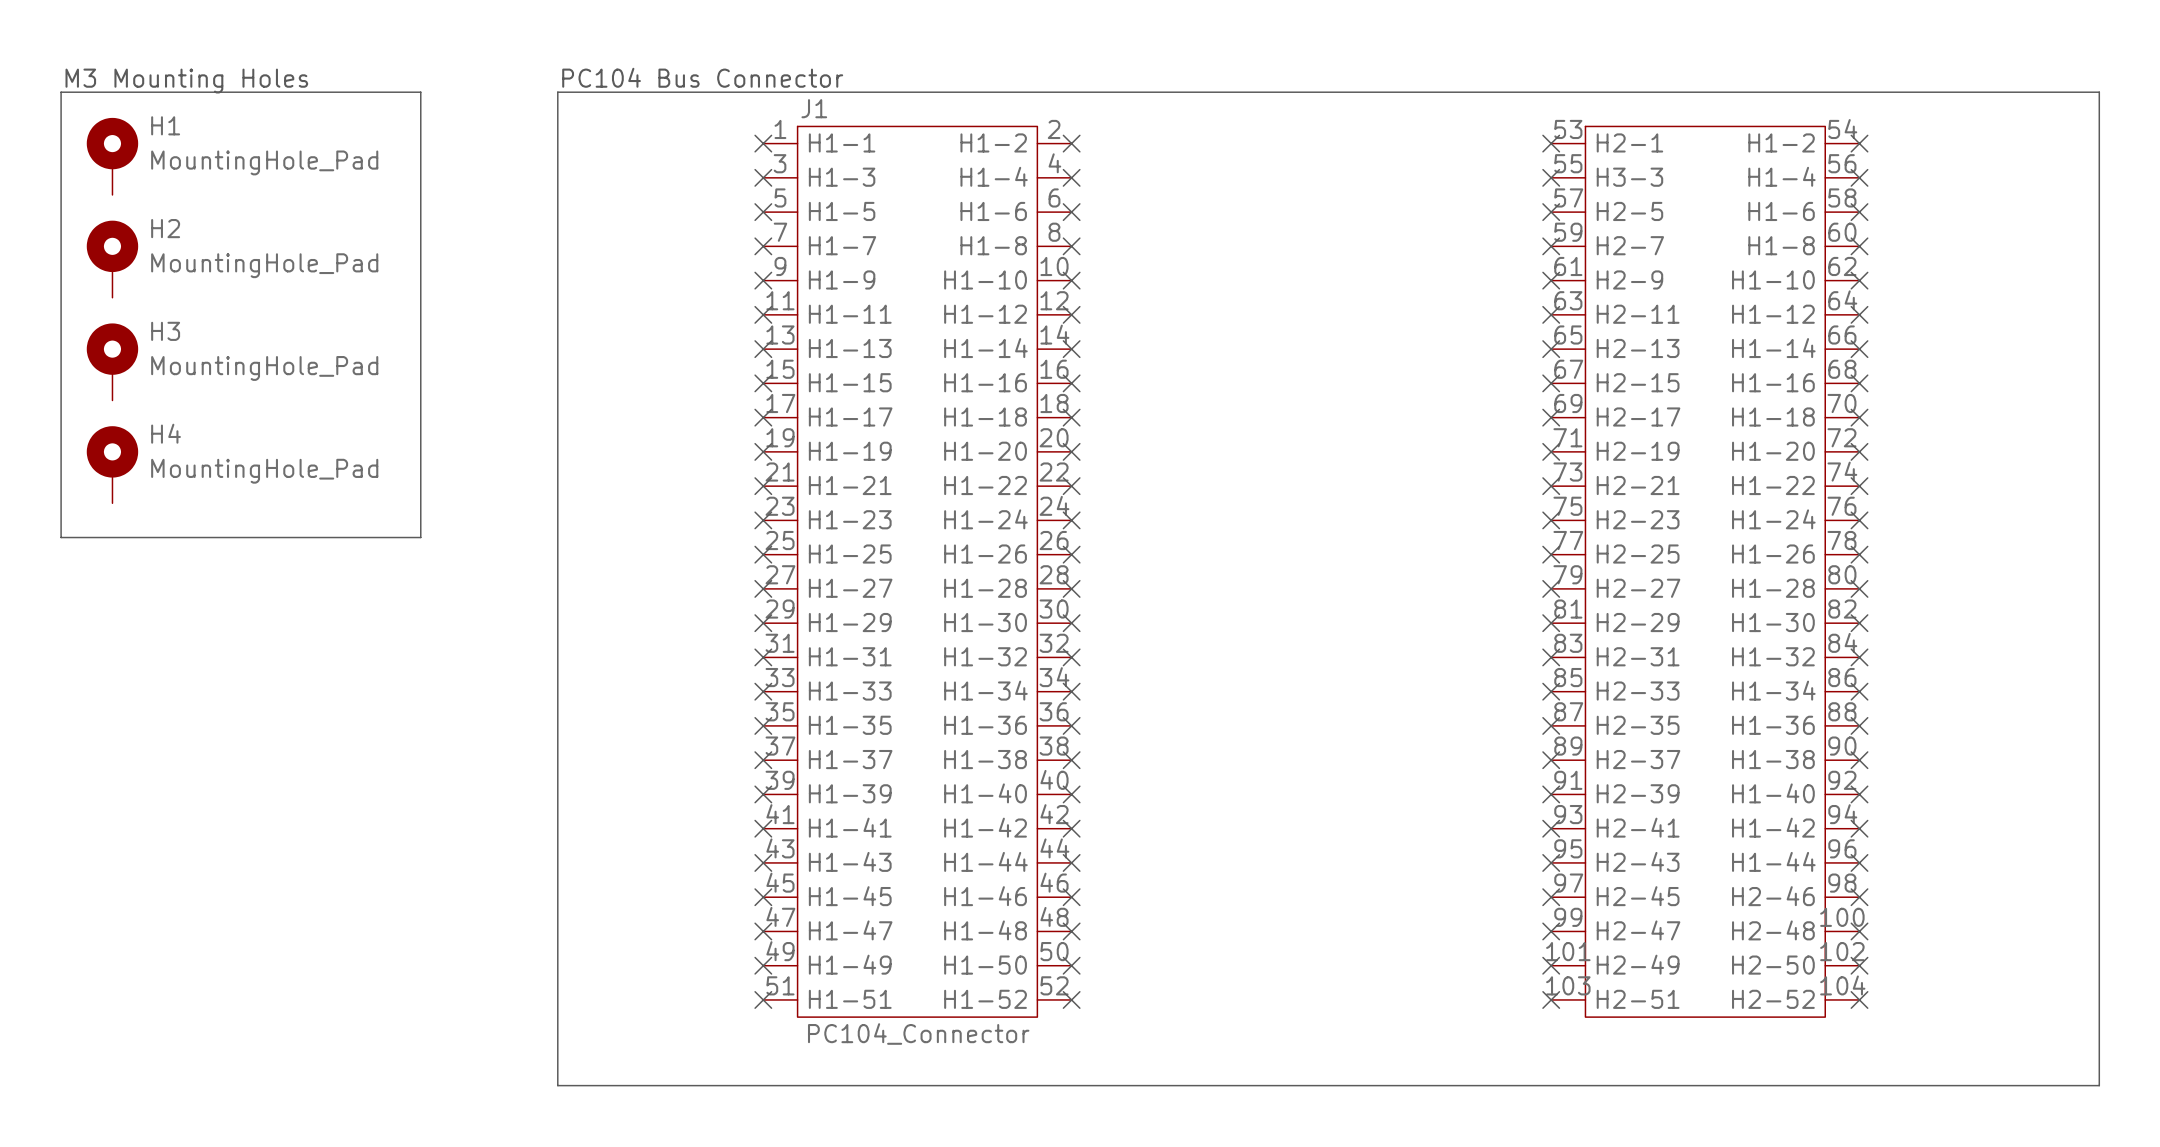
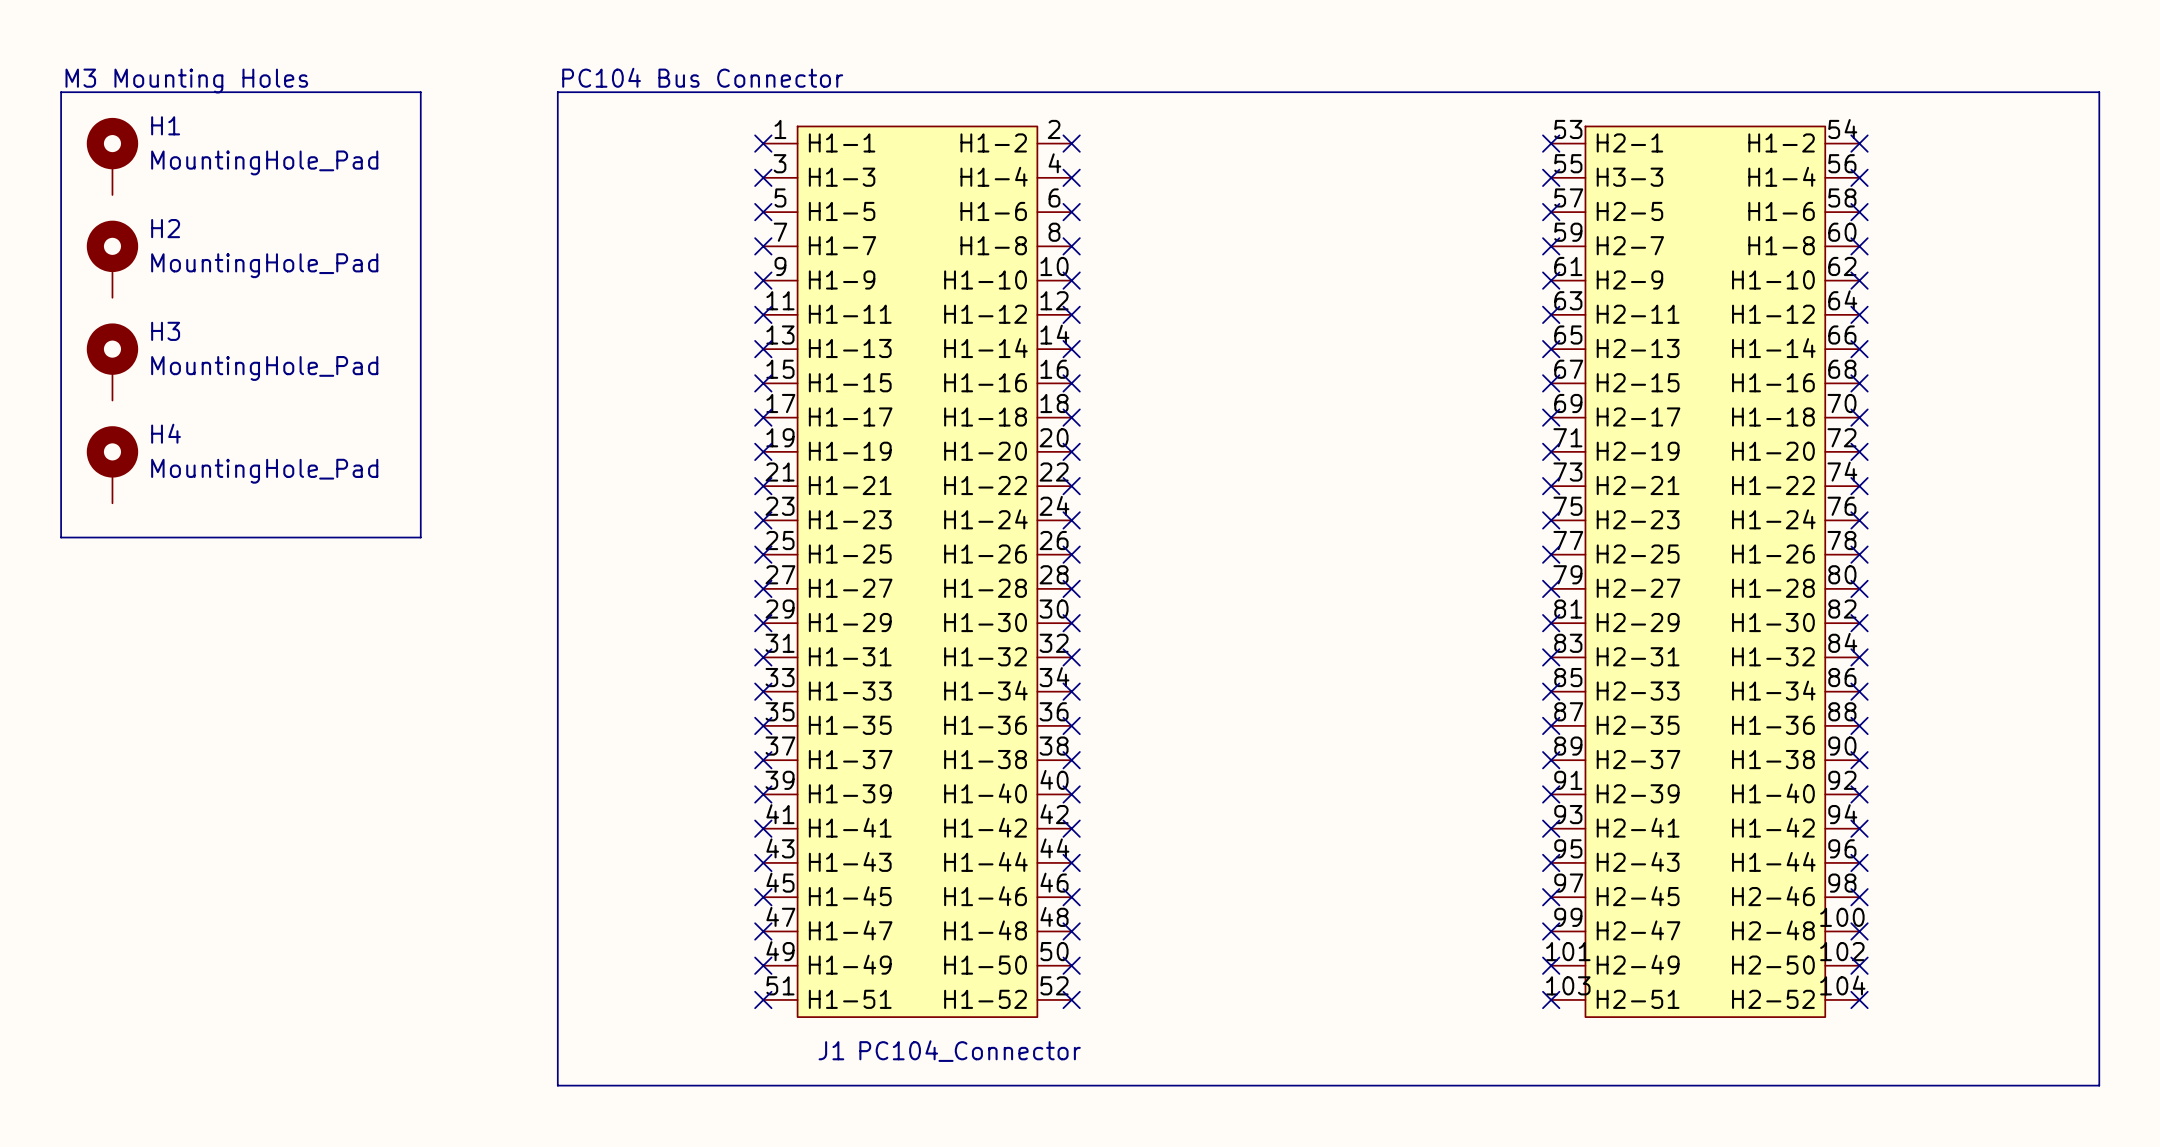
J1 name position: J1 (814, 108) -> J1 (831, 1050)
J1 value position: PC104_Connector (918, 1034) -> PC104_Connector (970, 1051)

